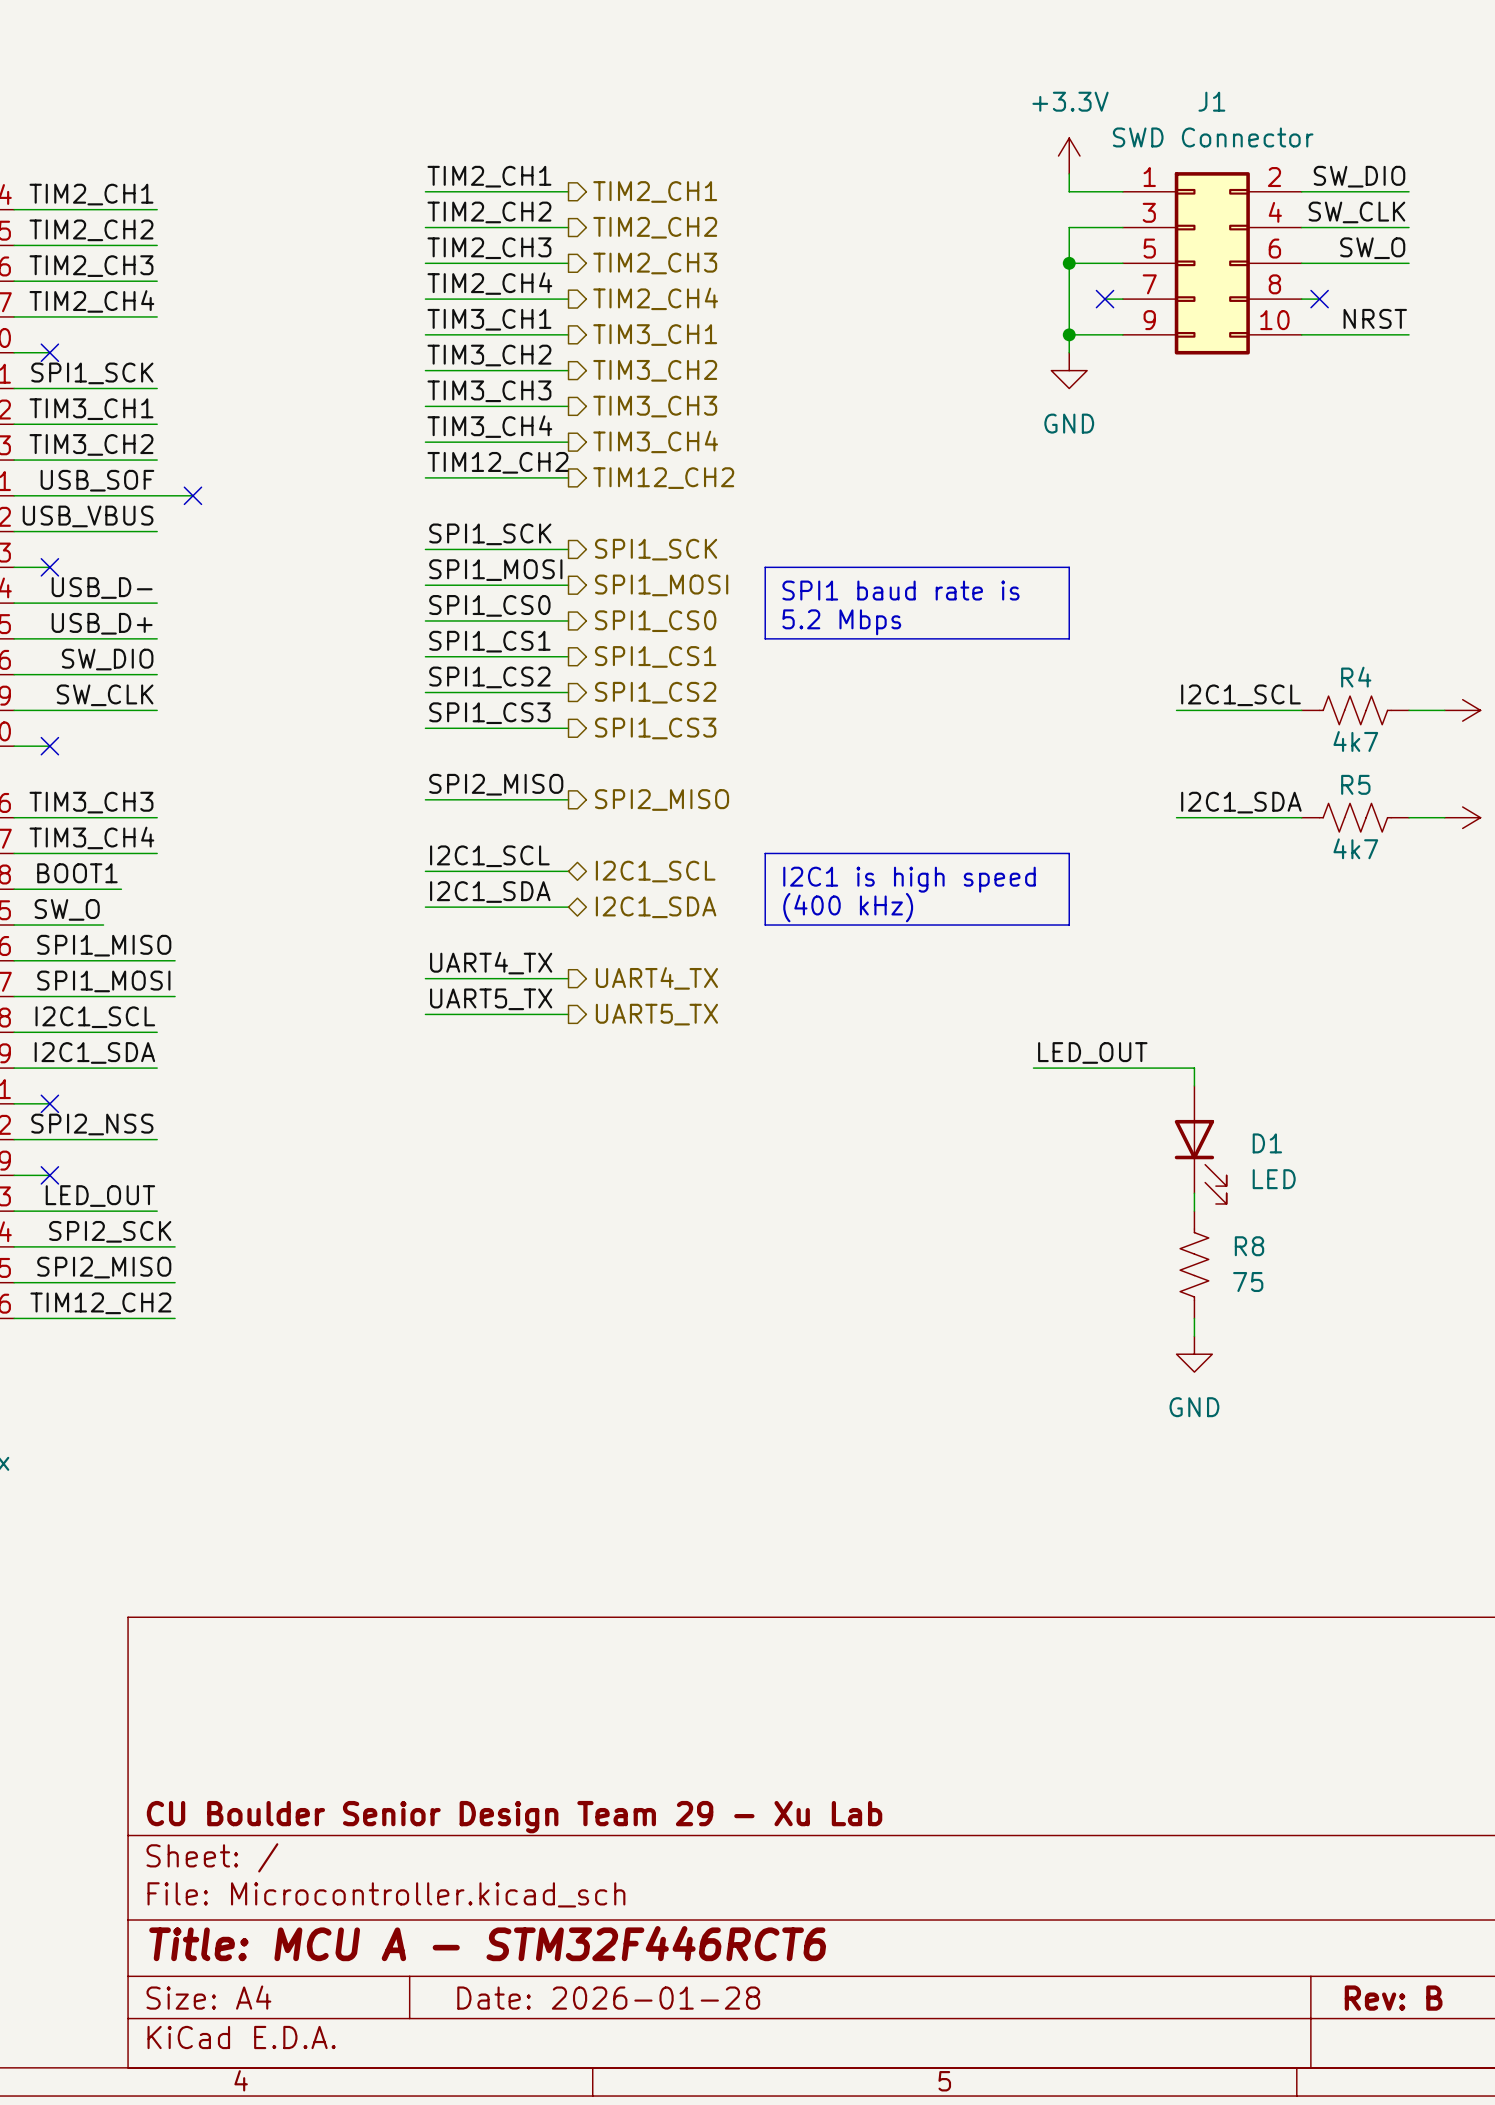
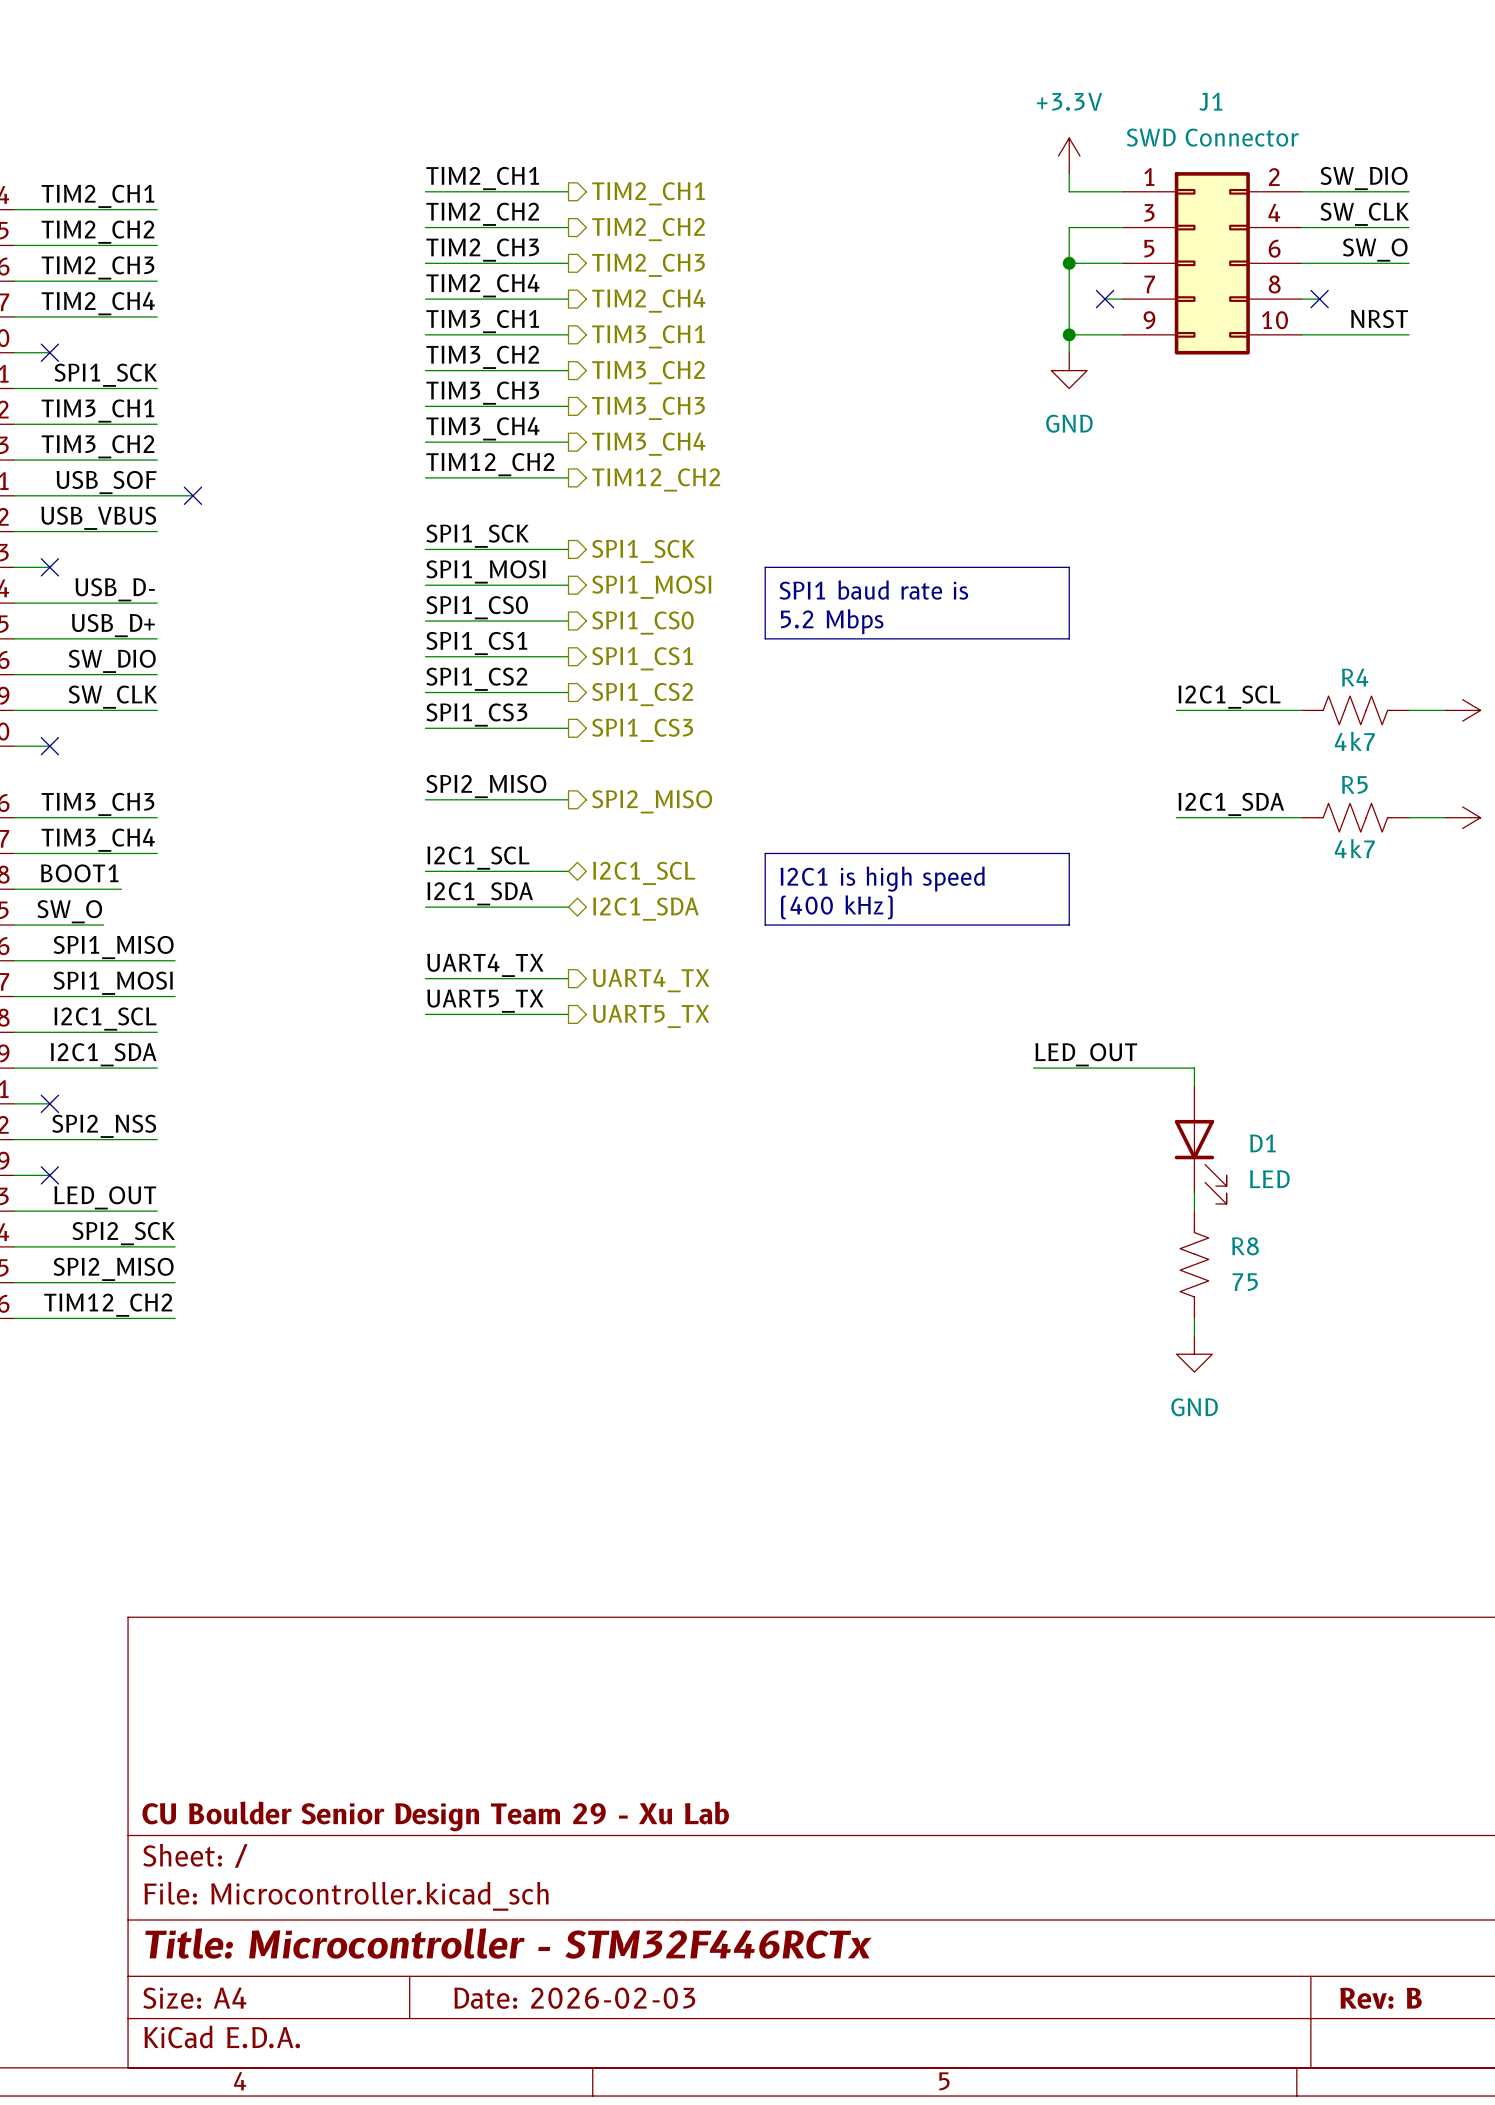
title block: Title: MCU A - STM32F446RCT6 (487, 1943) -> Title: Microcontroller - STM32F446RCTx (508, 1943)
title block: Date: 2026-01-28 (608, 1998) -> Date: 2026-02-03 (574, 1998)

